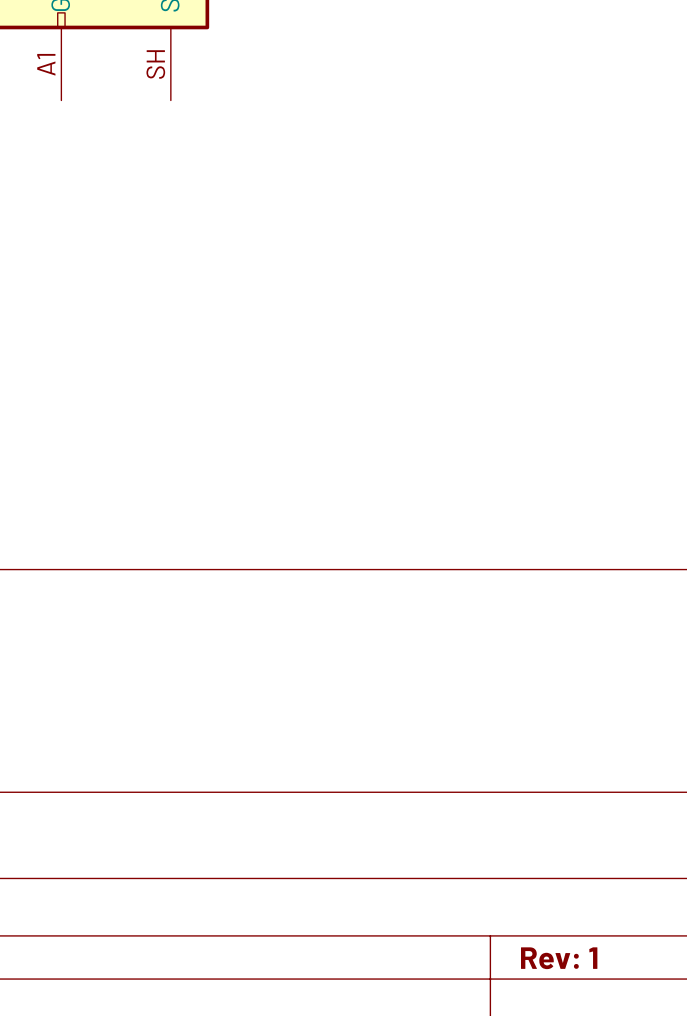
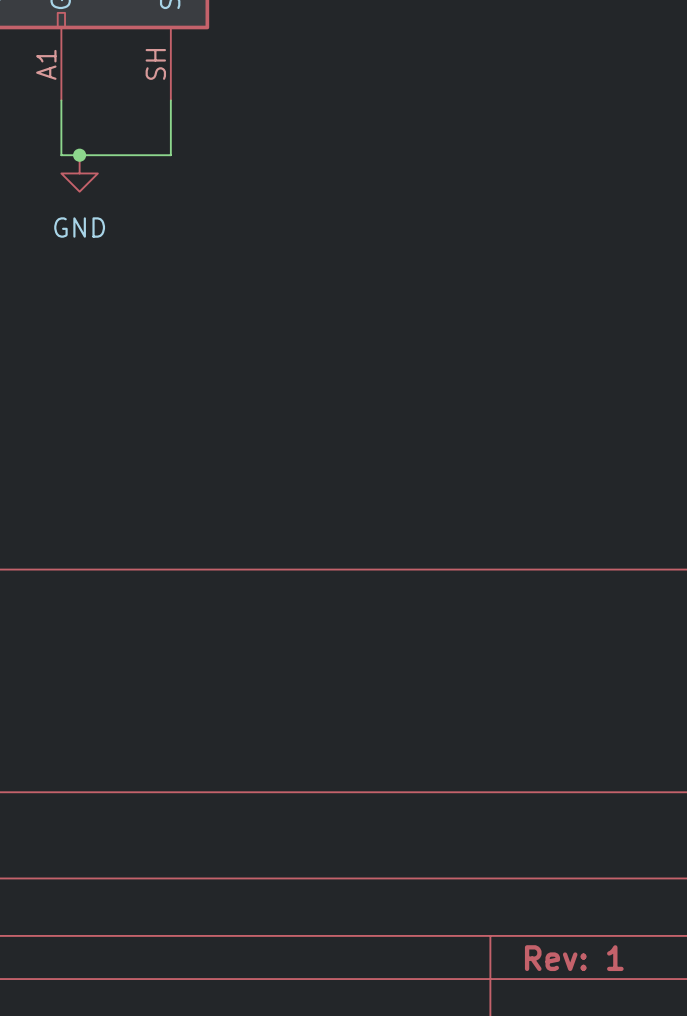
wire: none -> (61, 100) (61, 155) (170, 155) (170, 100)
junction: none -> (79, 155)
power symbol: none -> GND (79, 173)

